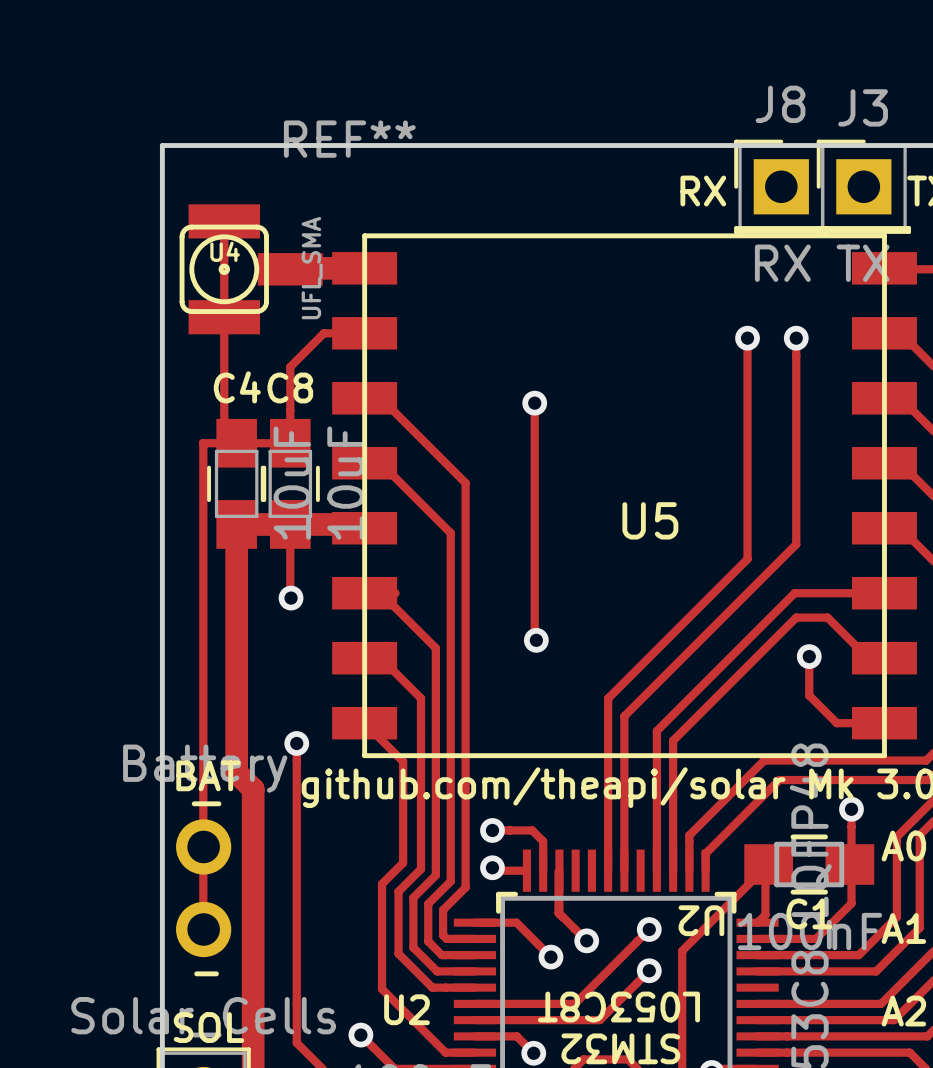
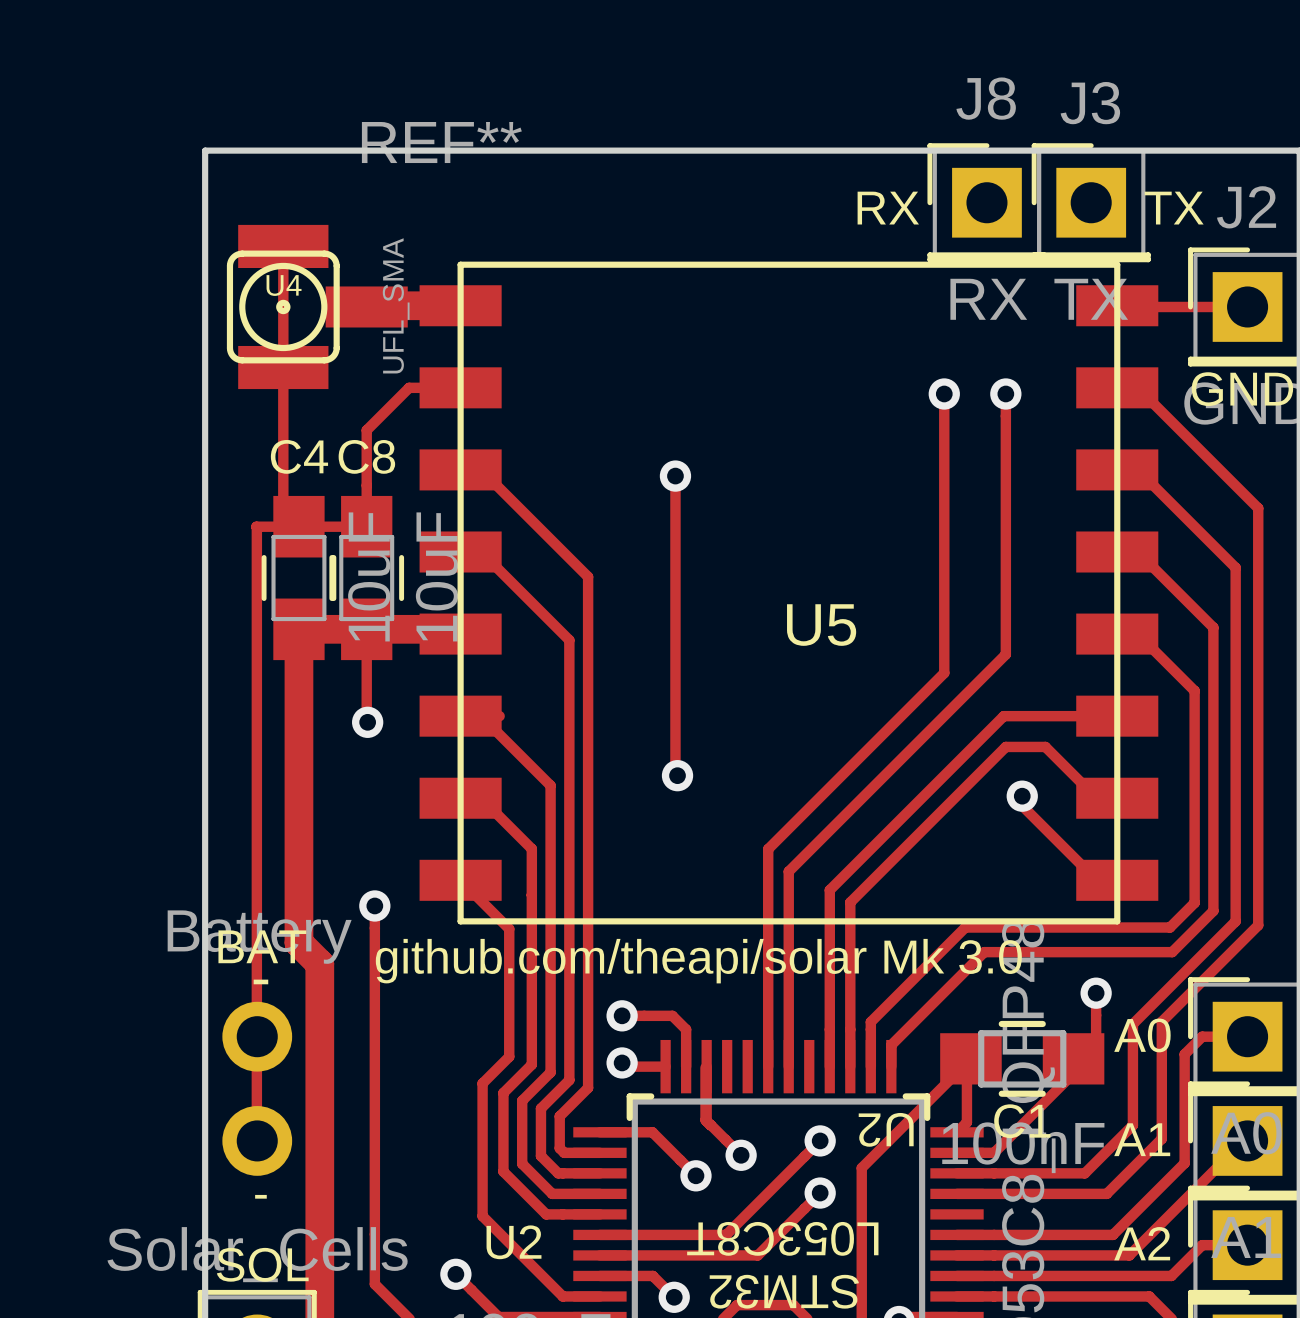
track: (809, 664) (809, 695) (836, 723) (868, 723) -> (1022, 805) (1096, 880)
track: (851, 809) (851, 903) (816, 938) (786, 938) -> (1096, 993) (1096, 1050) (994, 1152)
via position: (851, 809) -> (1096, 993)

